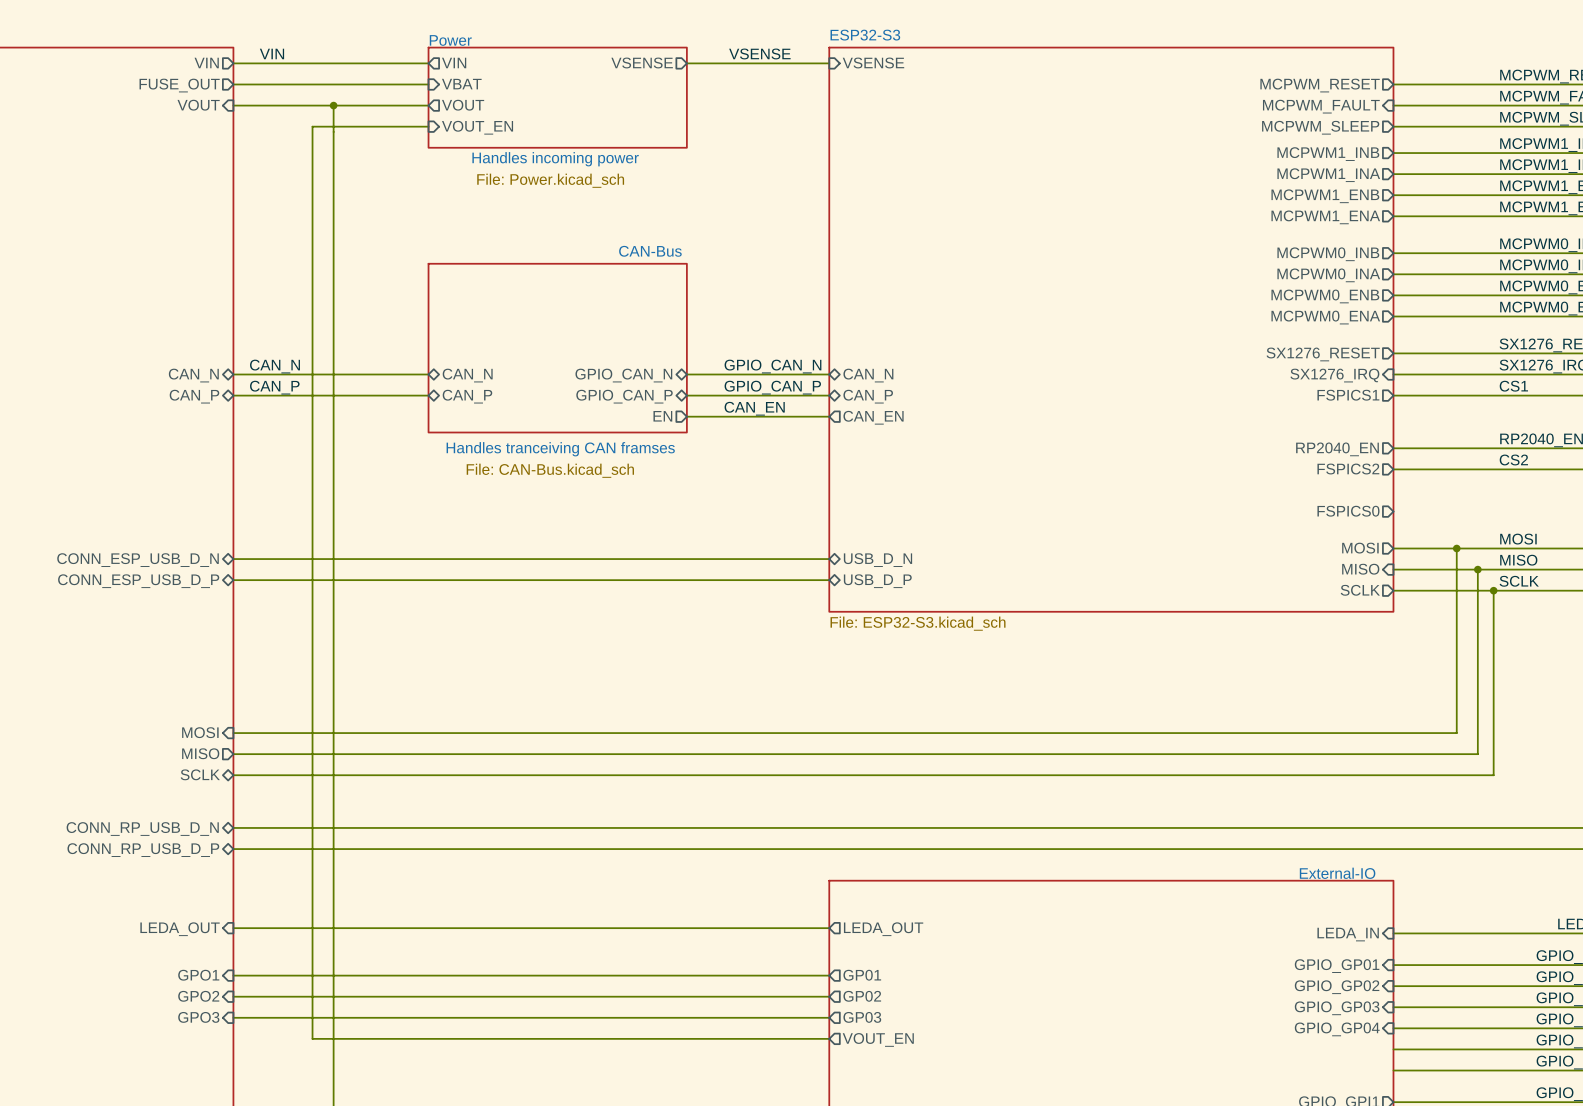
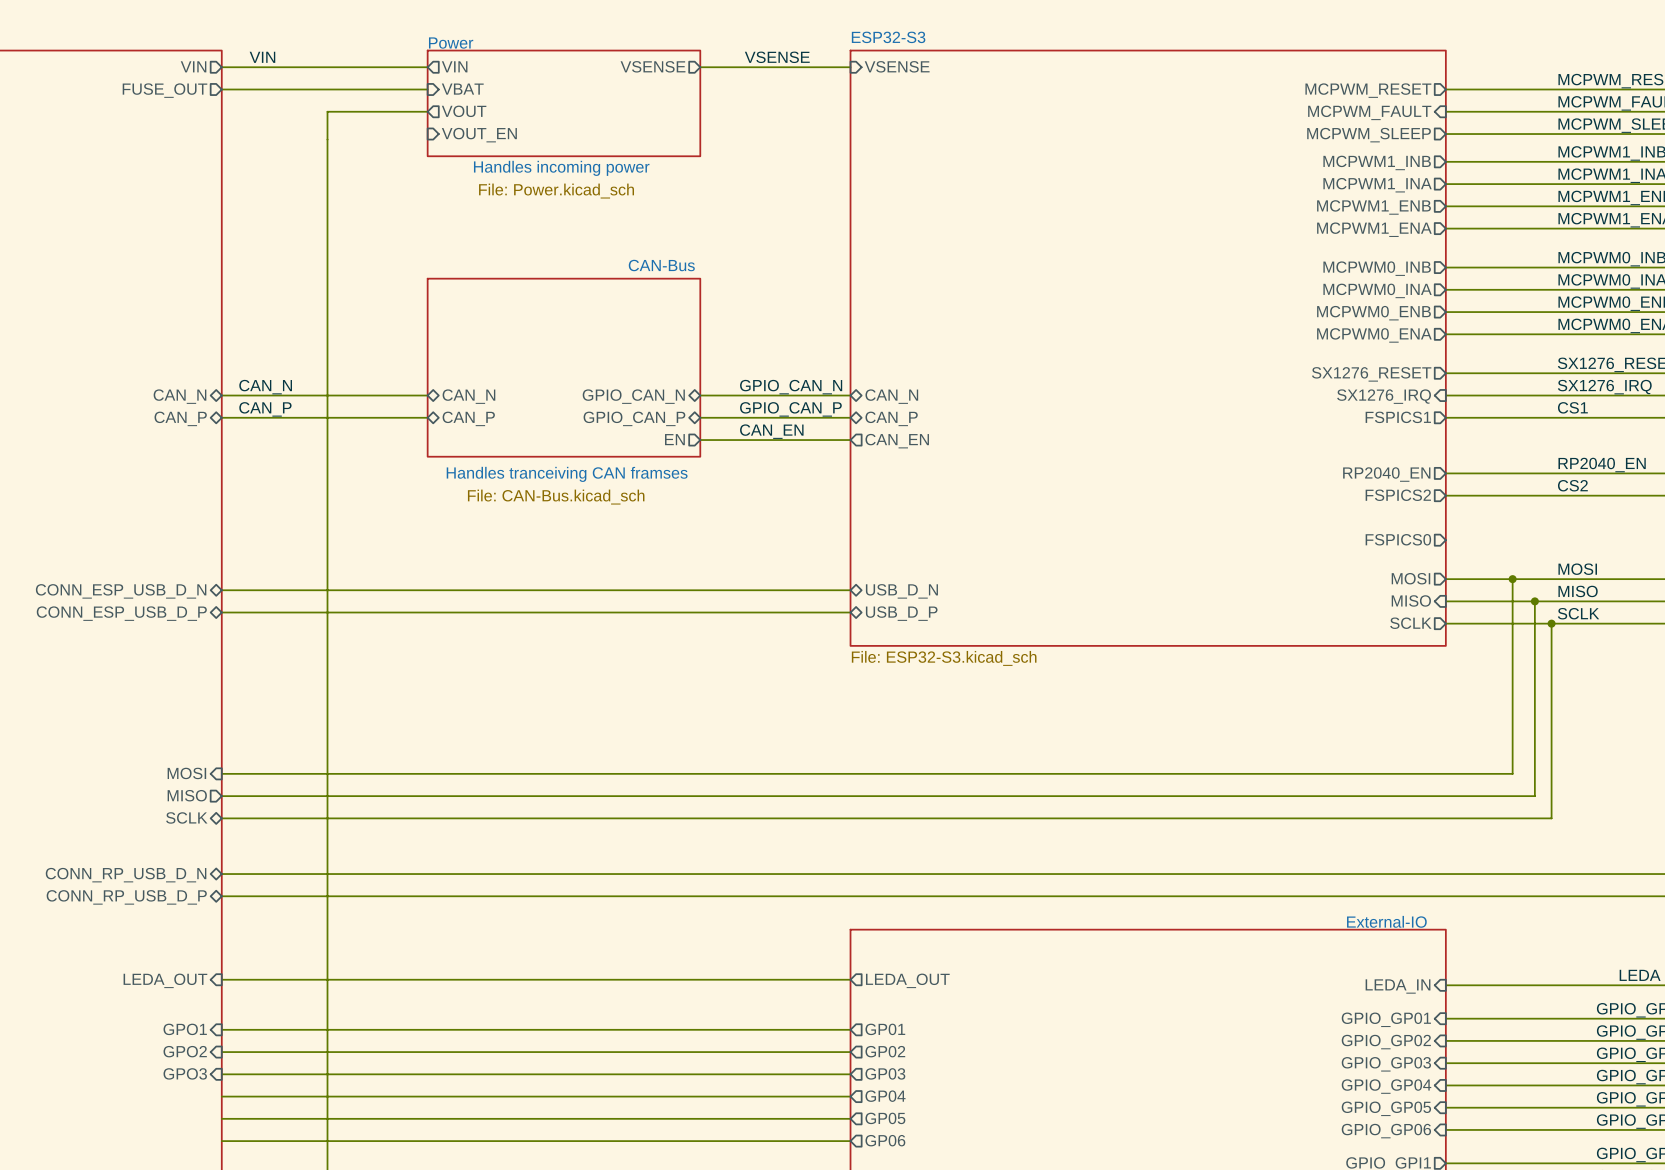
sheet pin: VOUT (198, 105) -> none
wire: (233, 105) (333, 105) -> none
junction: (333, 105) -> none
wire: (428, 126) (312, 126) (312, 1038) -> (221, 1096) (305, 1096)
sheet pin: VOUT_EN (878, 1039) -> GP04 (885, 1096)
sheet pin: none -> GPIO_GP05 (1386, 1108)
wire: none -> (221, 1118) (850, 1118)
sheet pin: none -> GP05 (885, 1118)
sheet pin: none -> GPIO_GP06 (1386, 1131)
sheet pin: none -> GP06 (885, 1140)
wire: none -> (221, 1141) (850, 1141)

